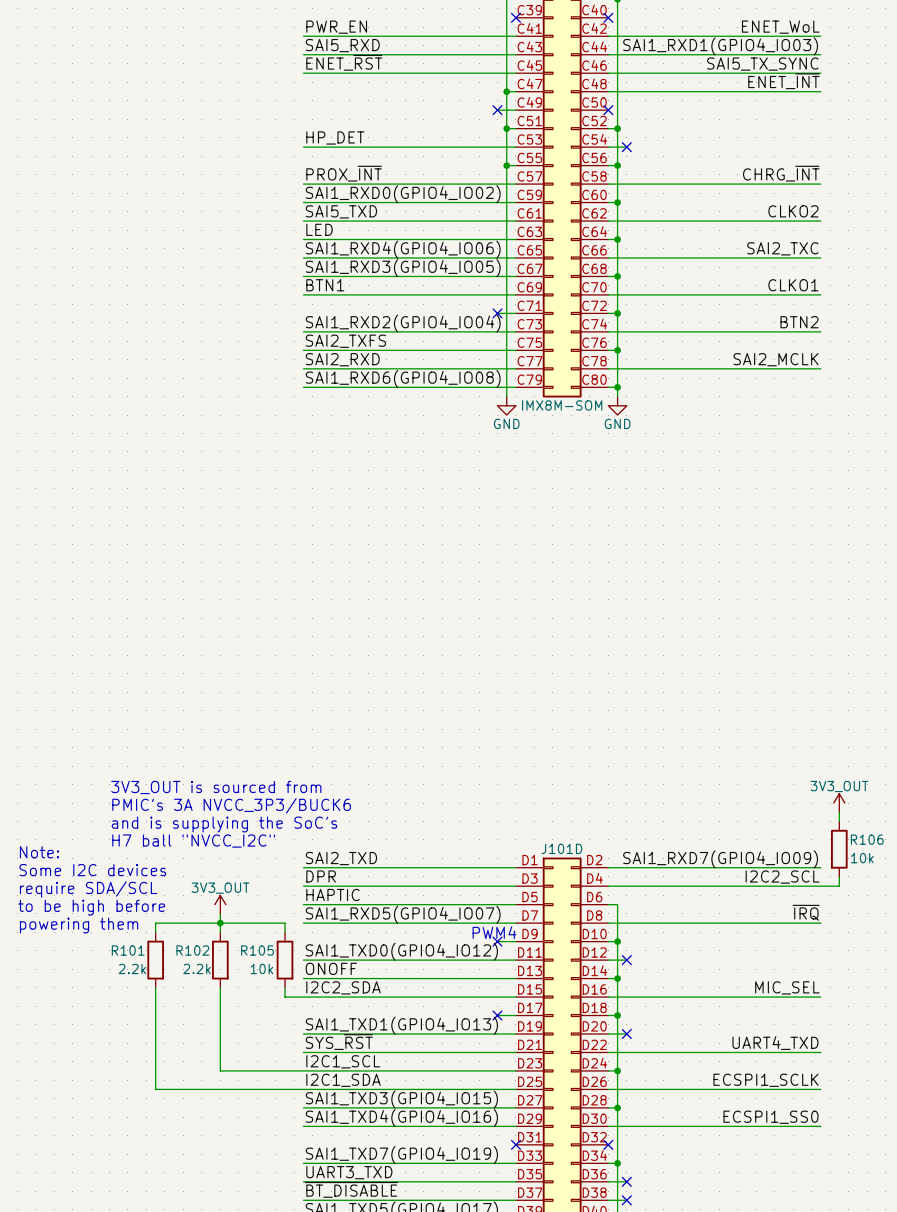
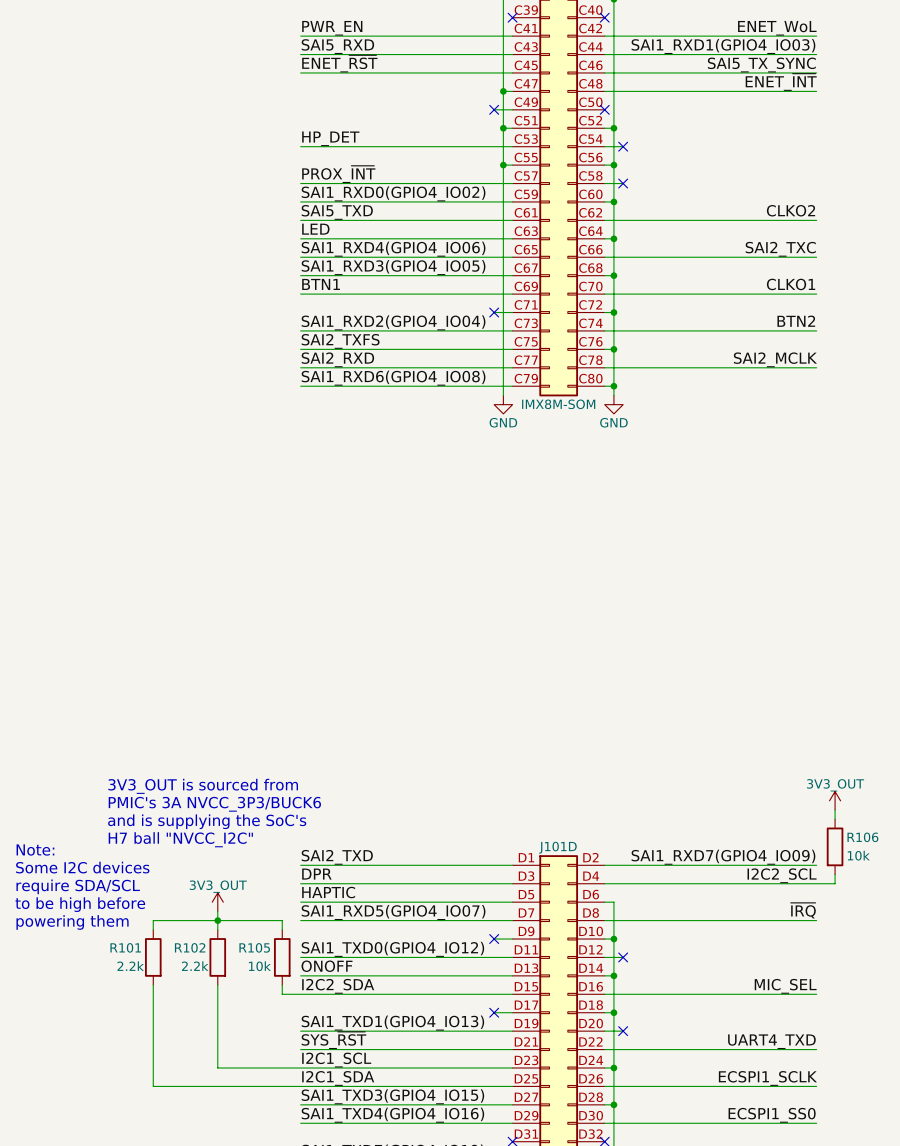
label: CHRG_~{INT} (781, 173) -> none
wire: (626, 184) (820, 184) -> none
no-connect mark: none -> (623, 183)
text: PWM4 (494, 932) -> none

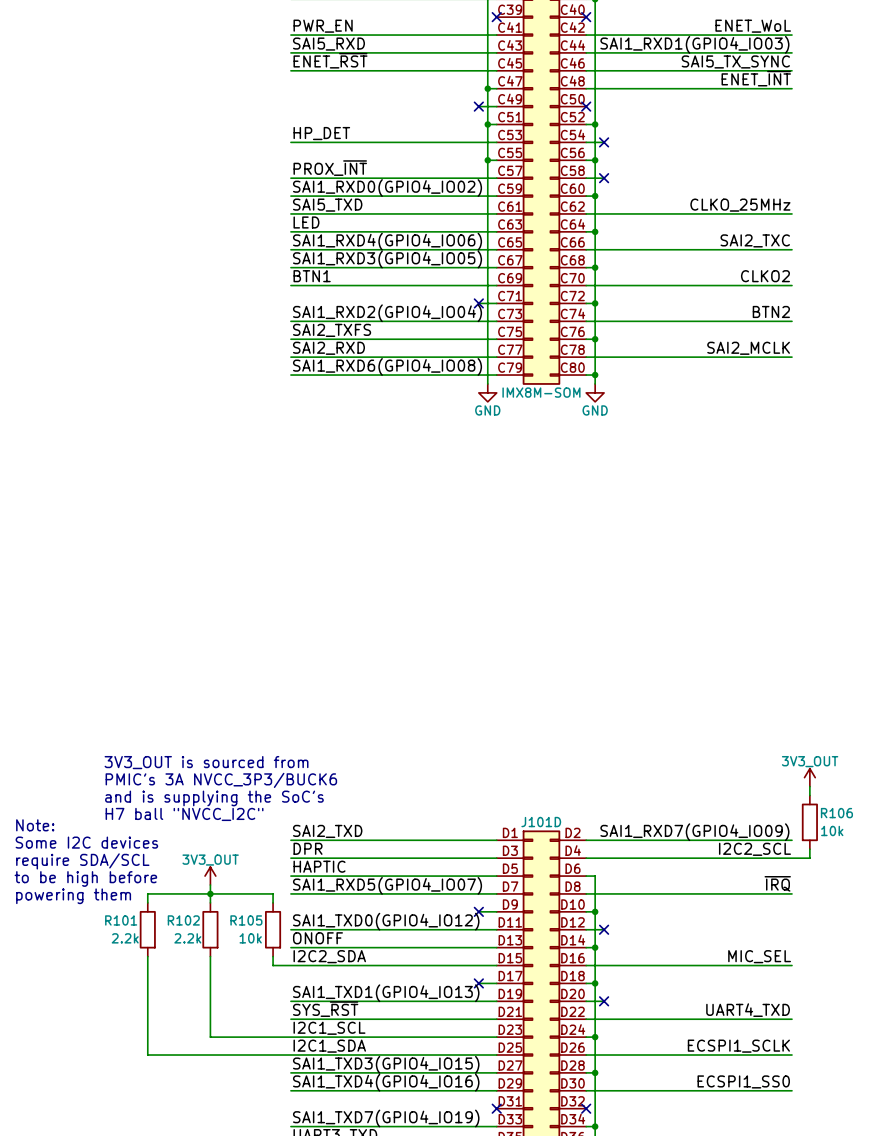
label: CLKO2 (791, 210) -> CLKO_25MHz (740, 205)
label: CLKO1 (791, 284) -> CLKO2 (765, 276)

